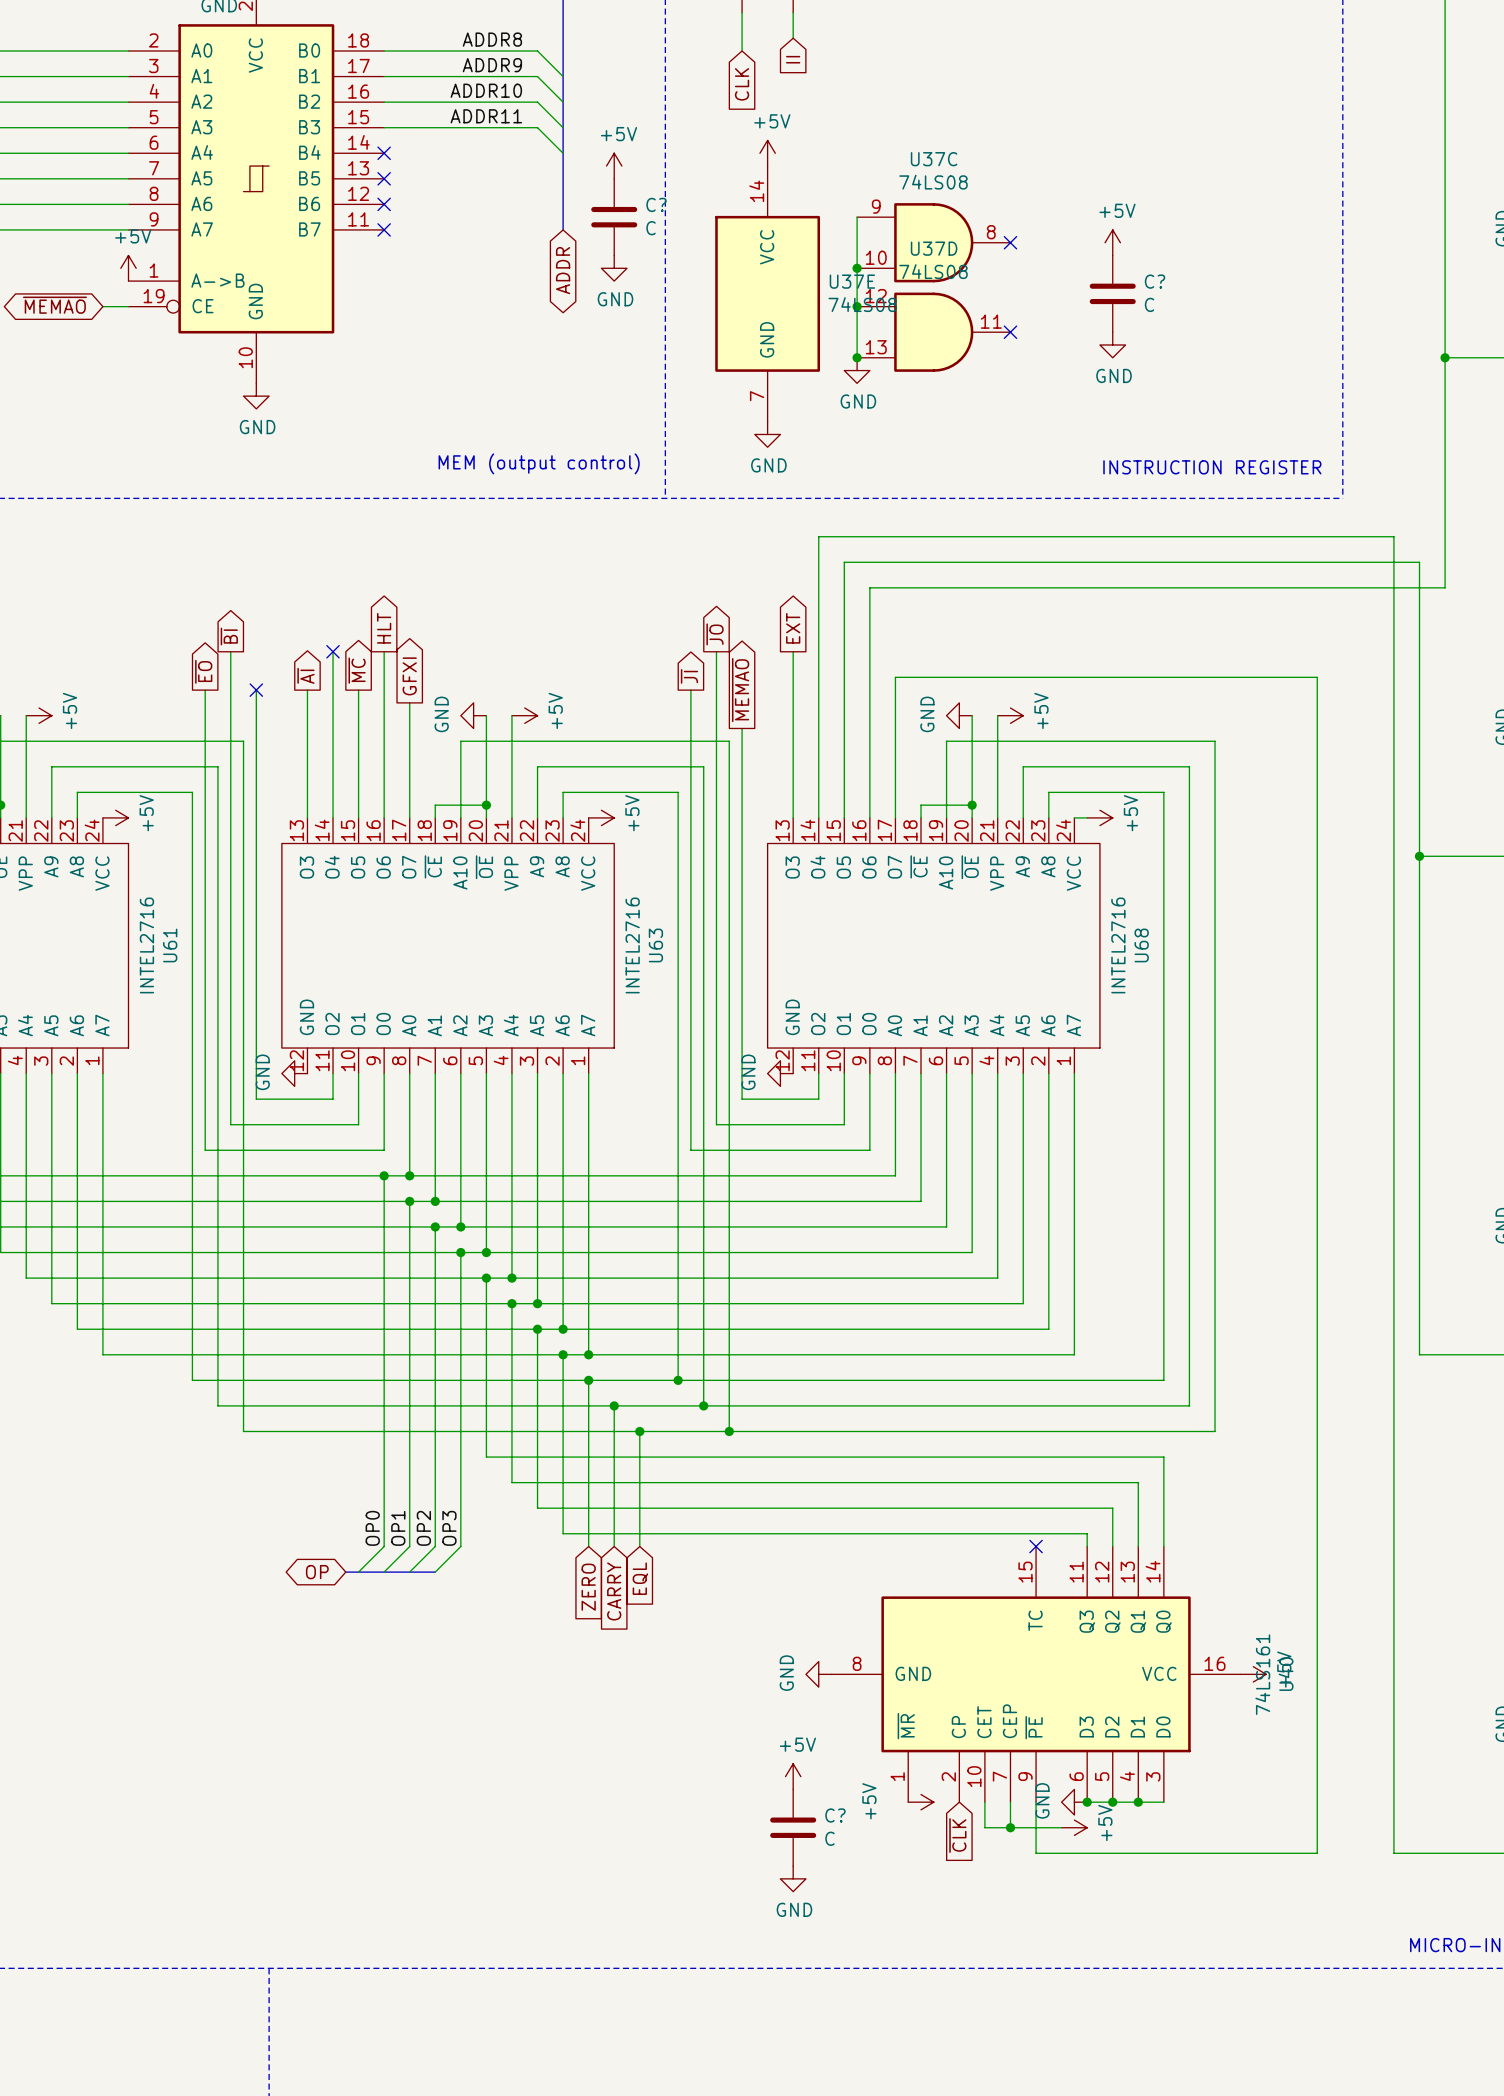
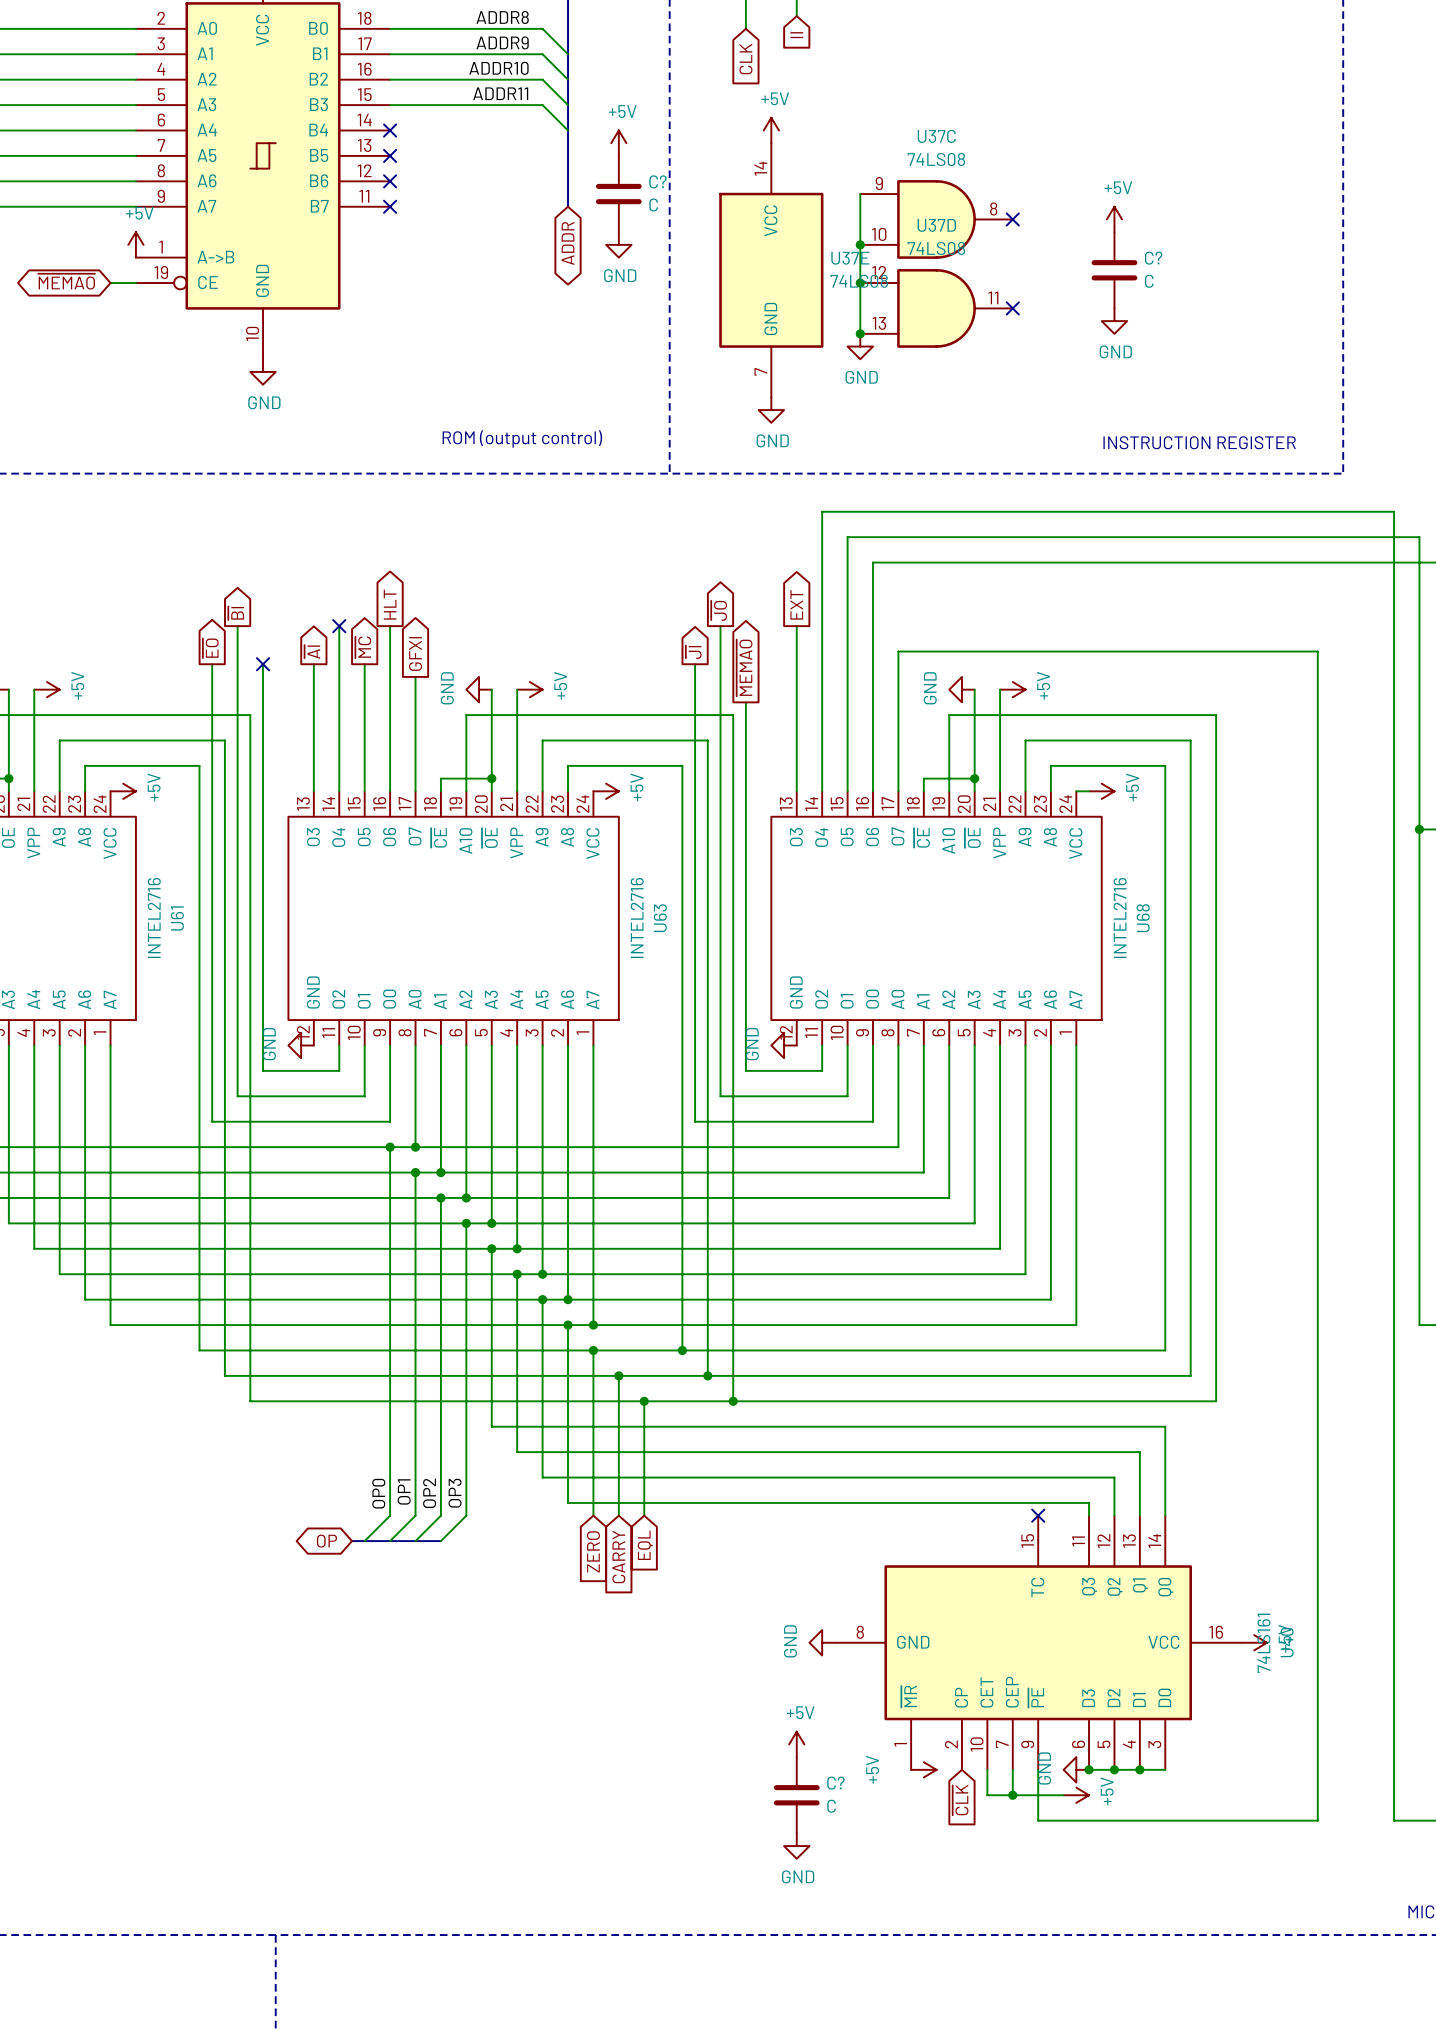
text: MEM (output control) (539, 463) -> ROM (output control) (522, 438)

